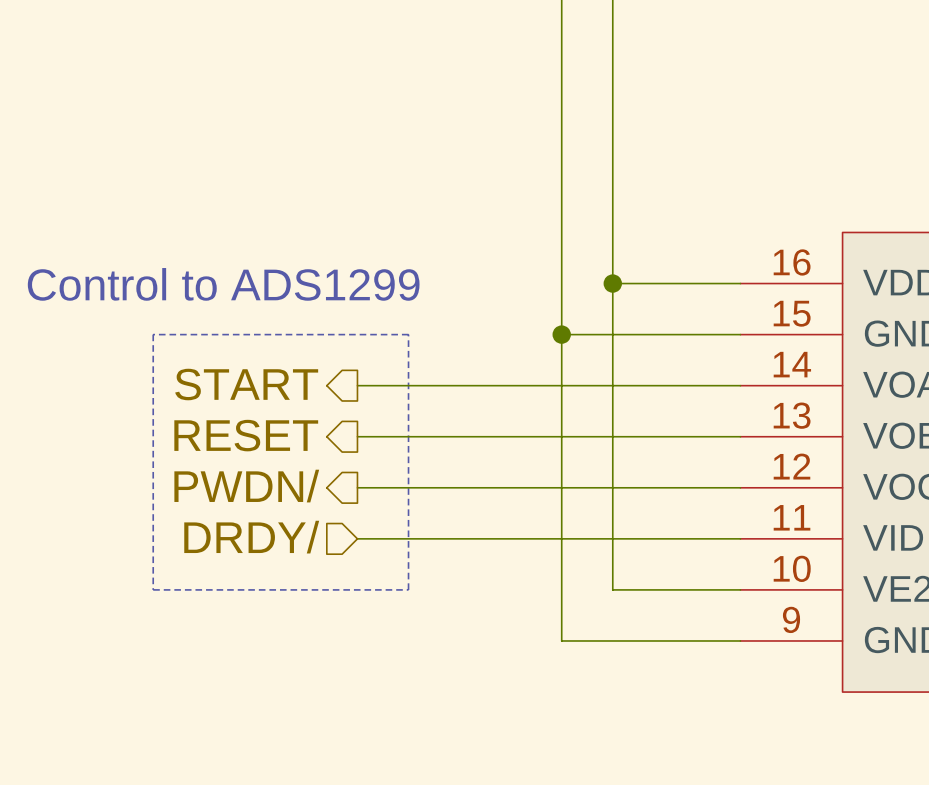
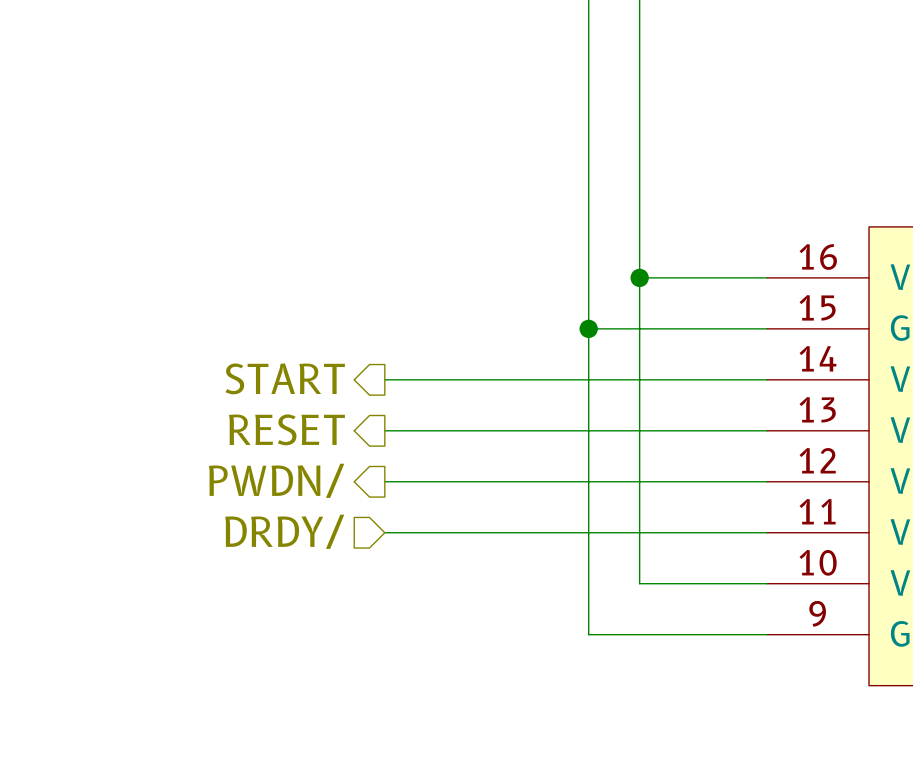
text: Control to ADS1299 (223, 284) -> none
line: (153, 334) (153, 589) (408, 589) (408, 334) (153, 334) -> none

